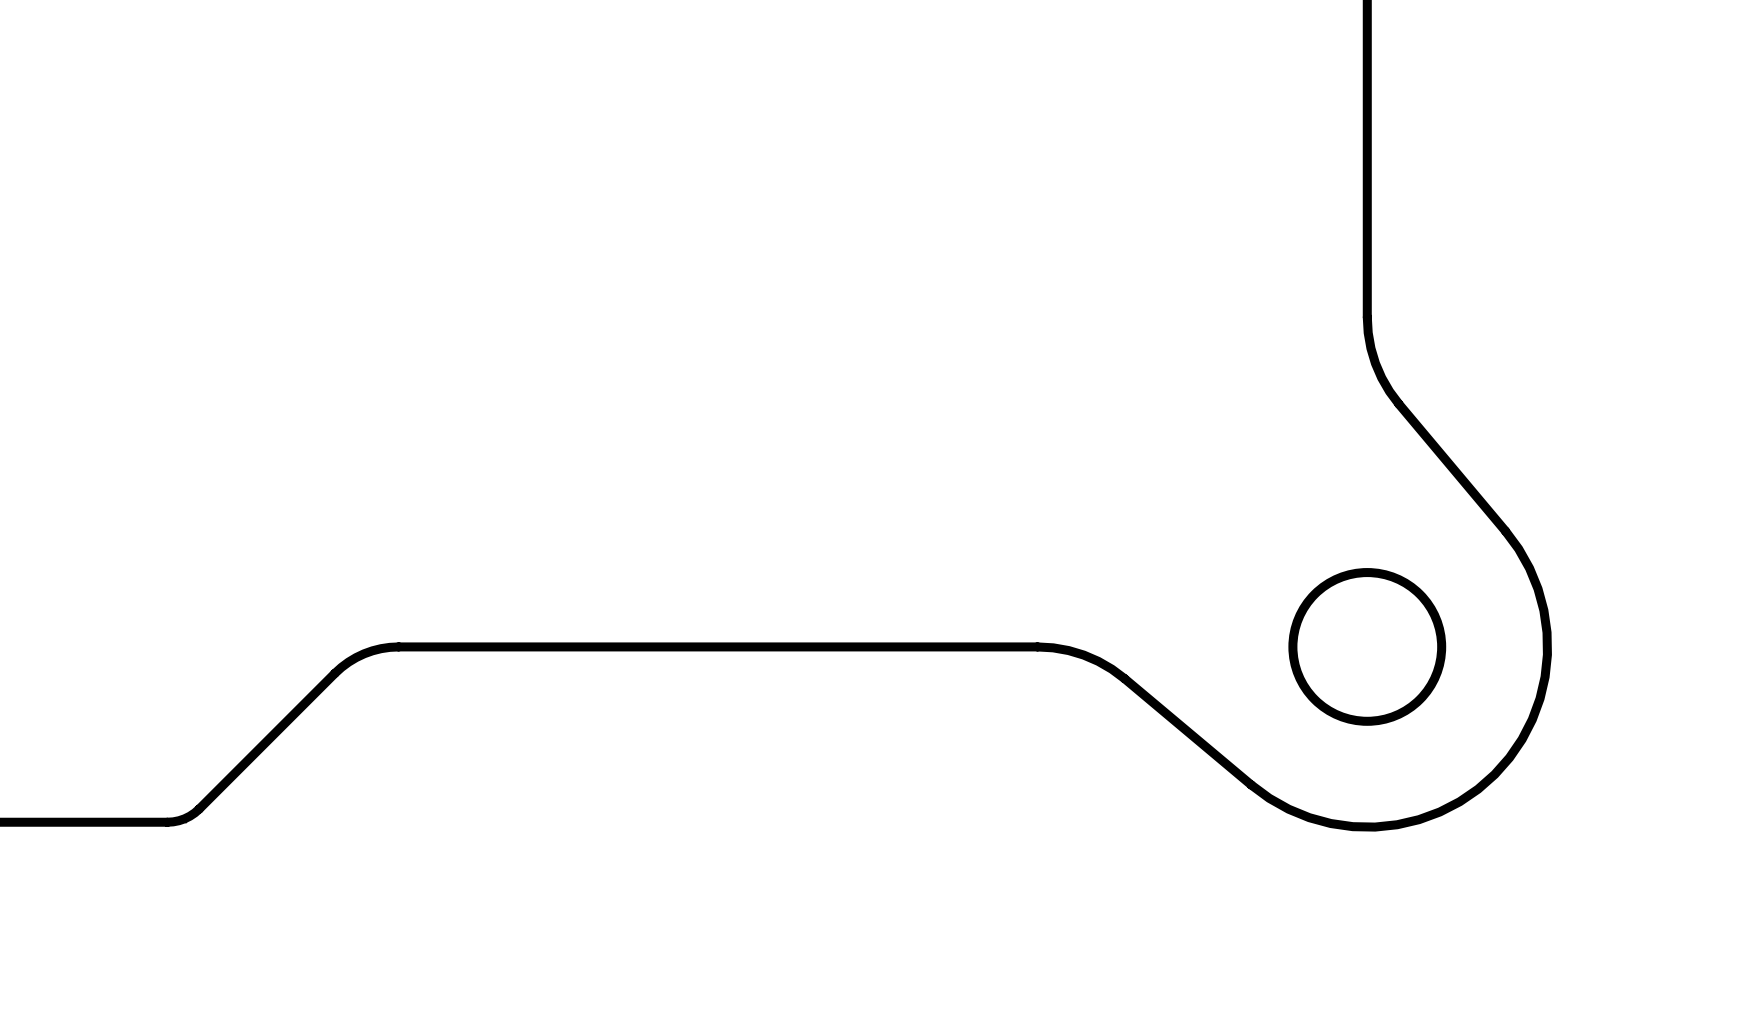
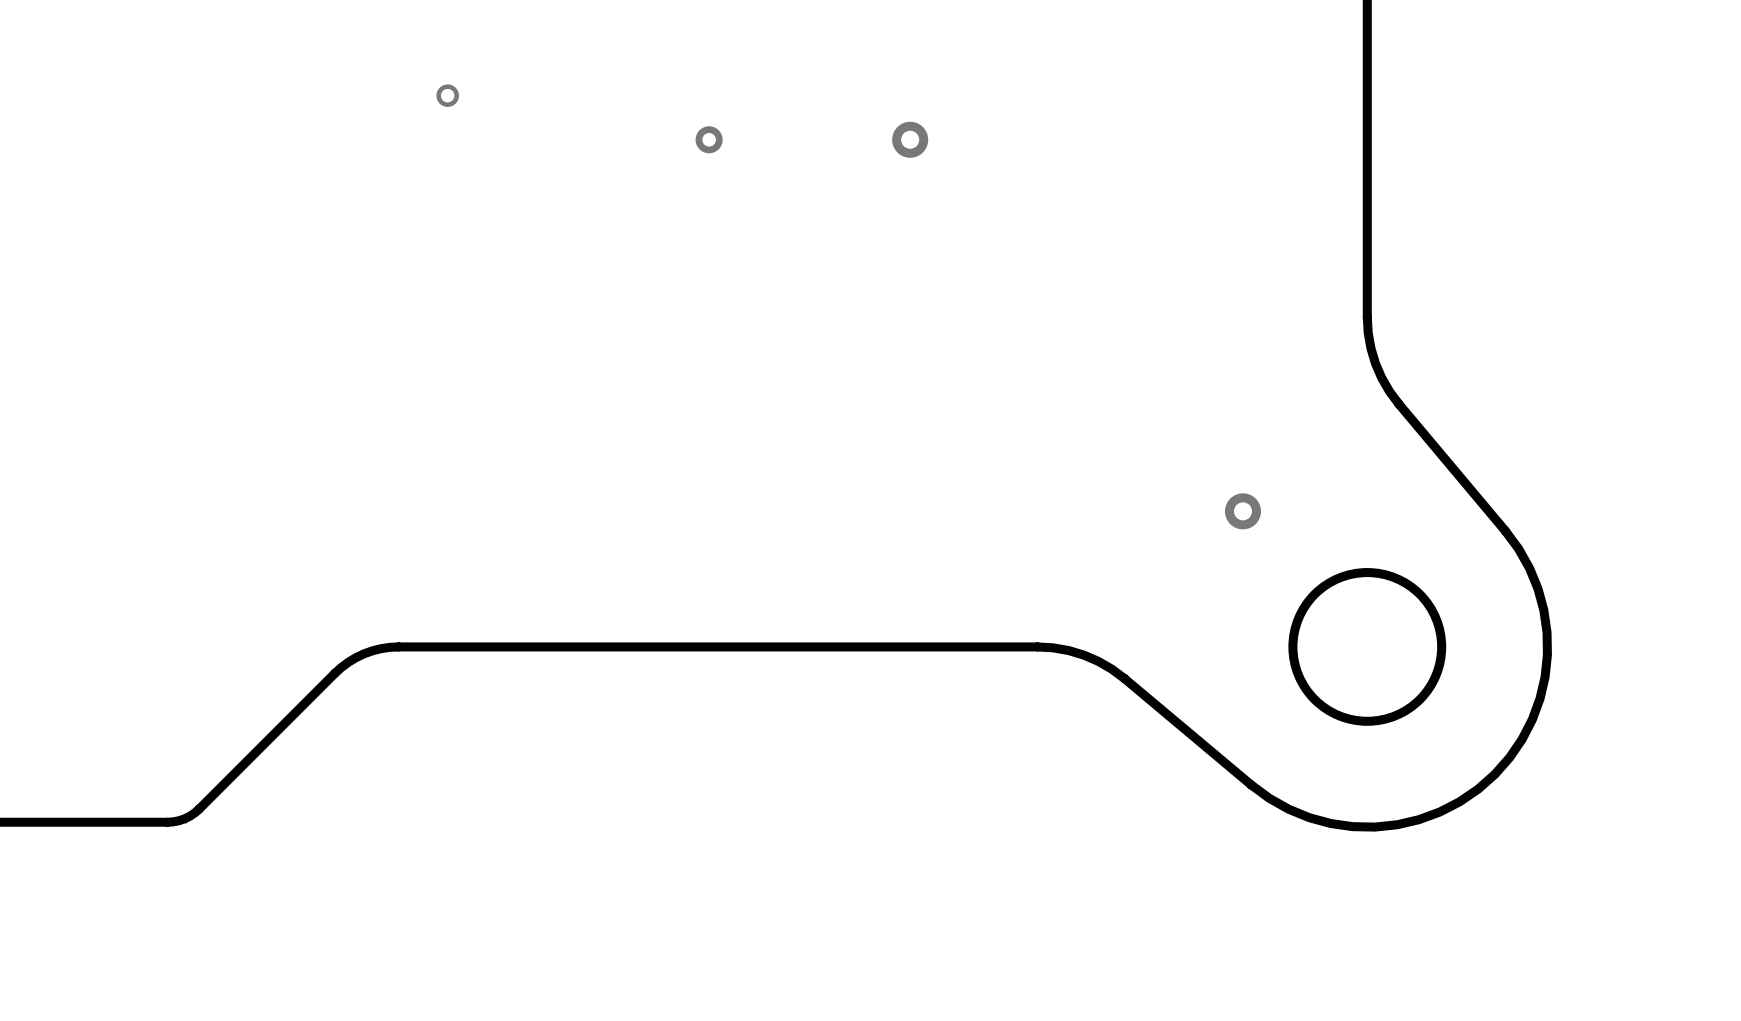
via: none -> (447, 95)
via: none -> (709, 139)
via: none -> (910, 139)
via: none -> (1242, 511)

